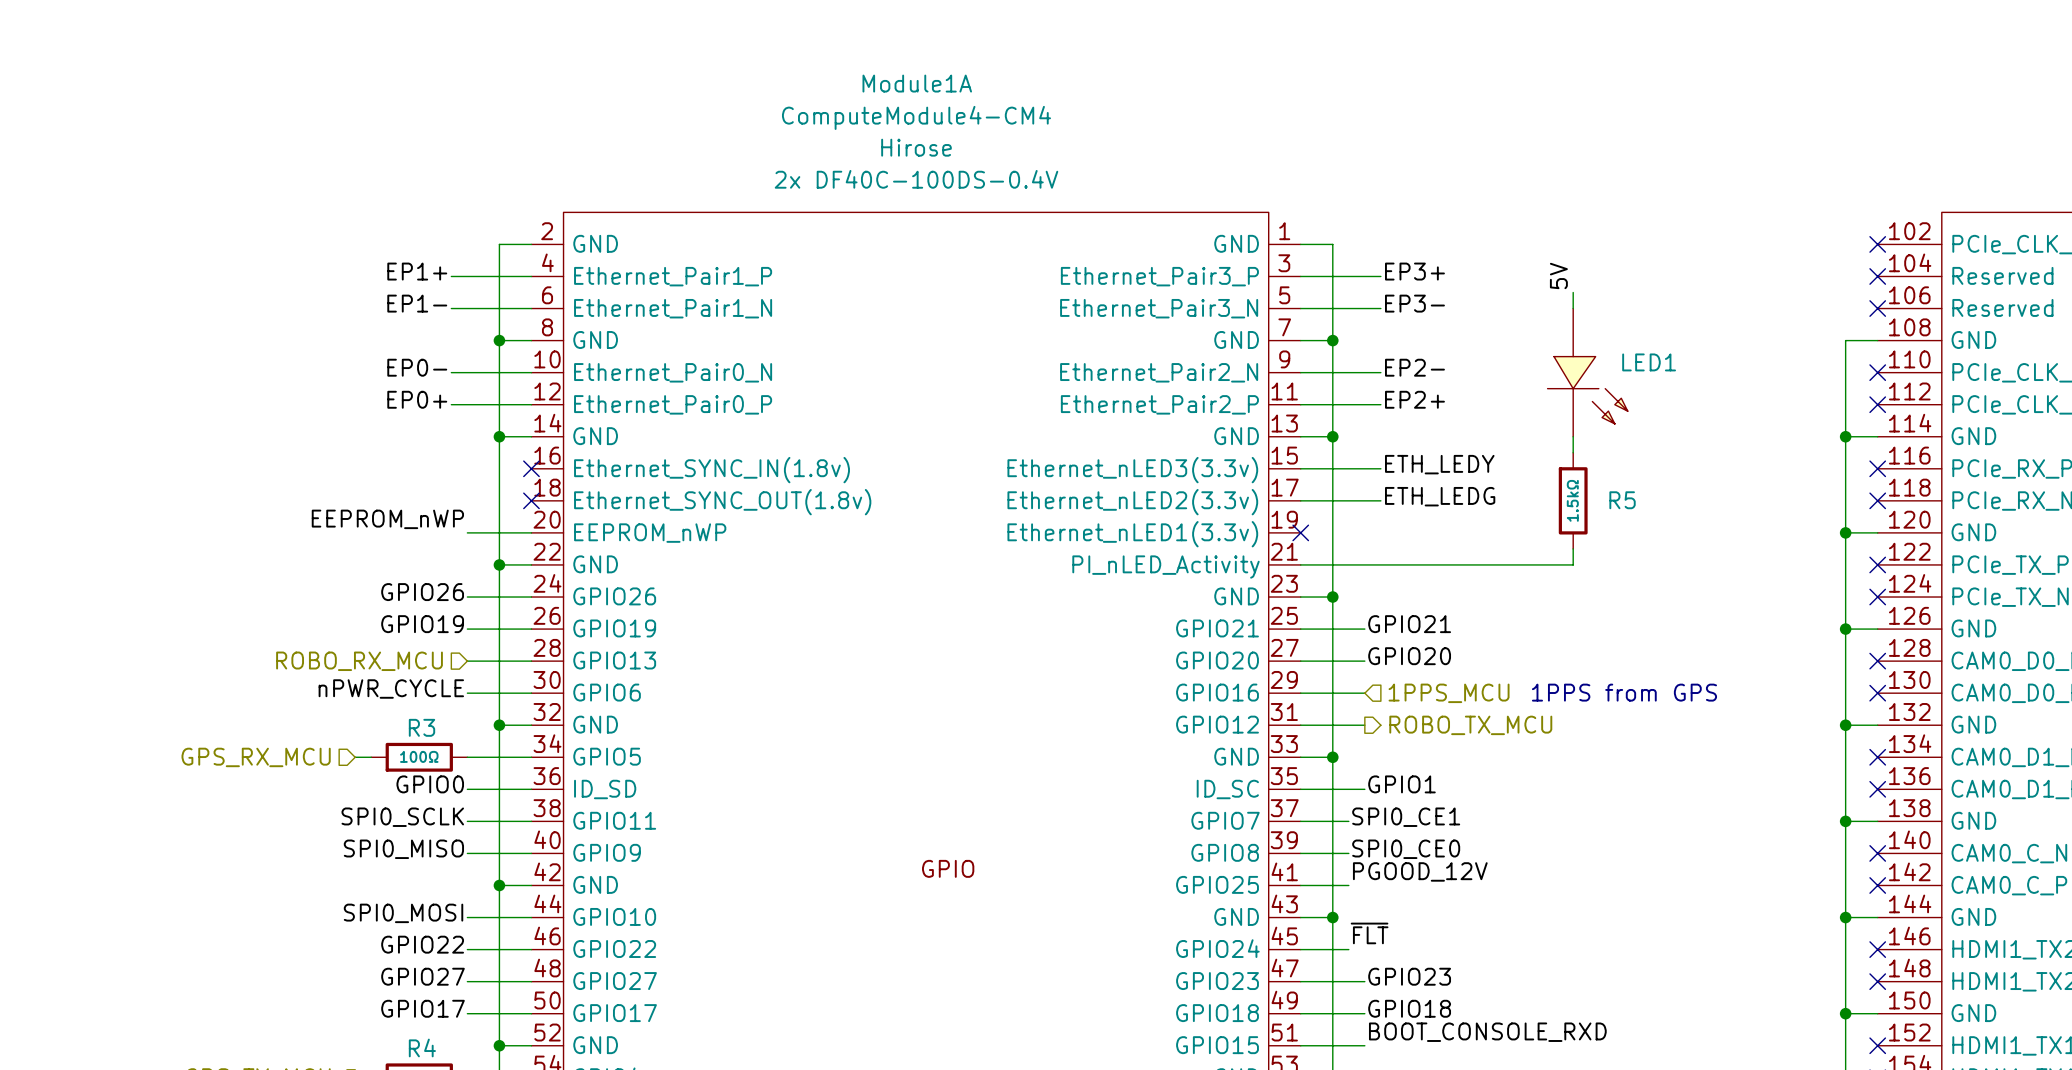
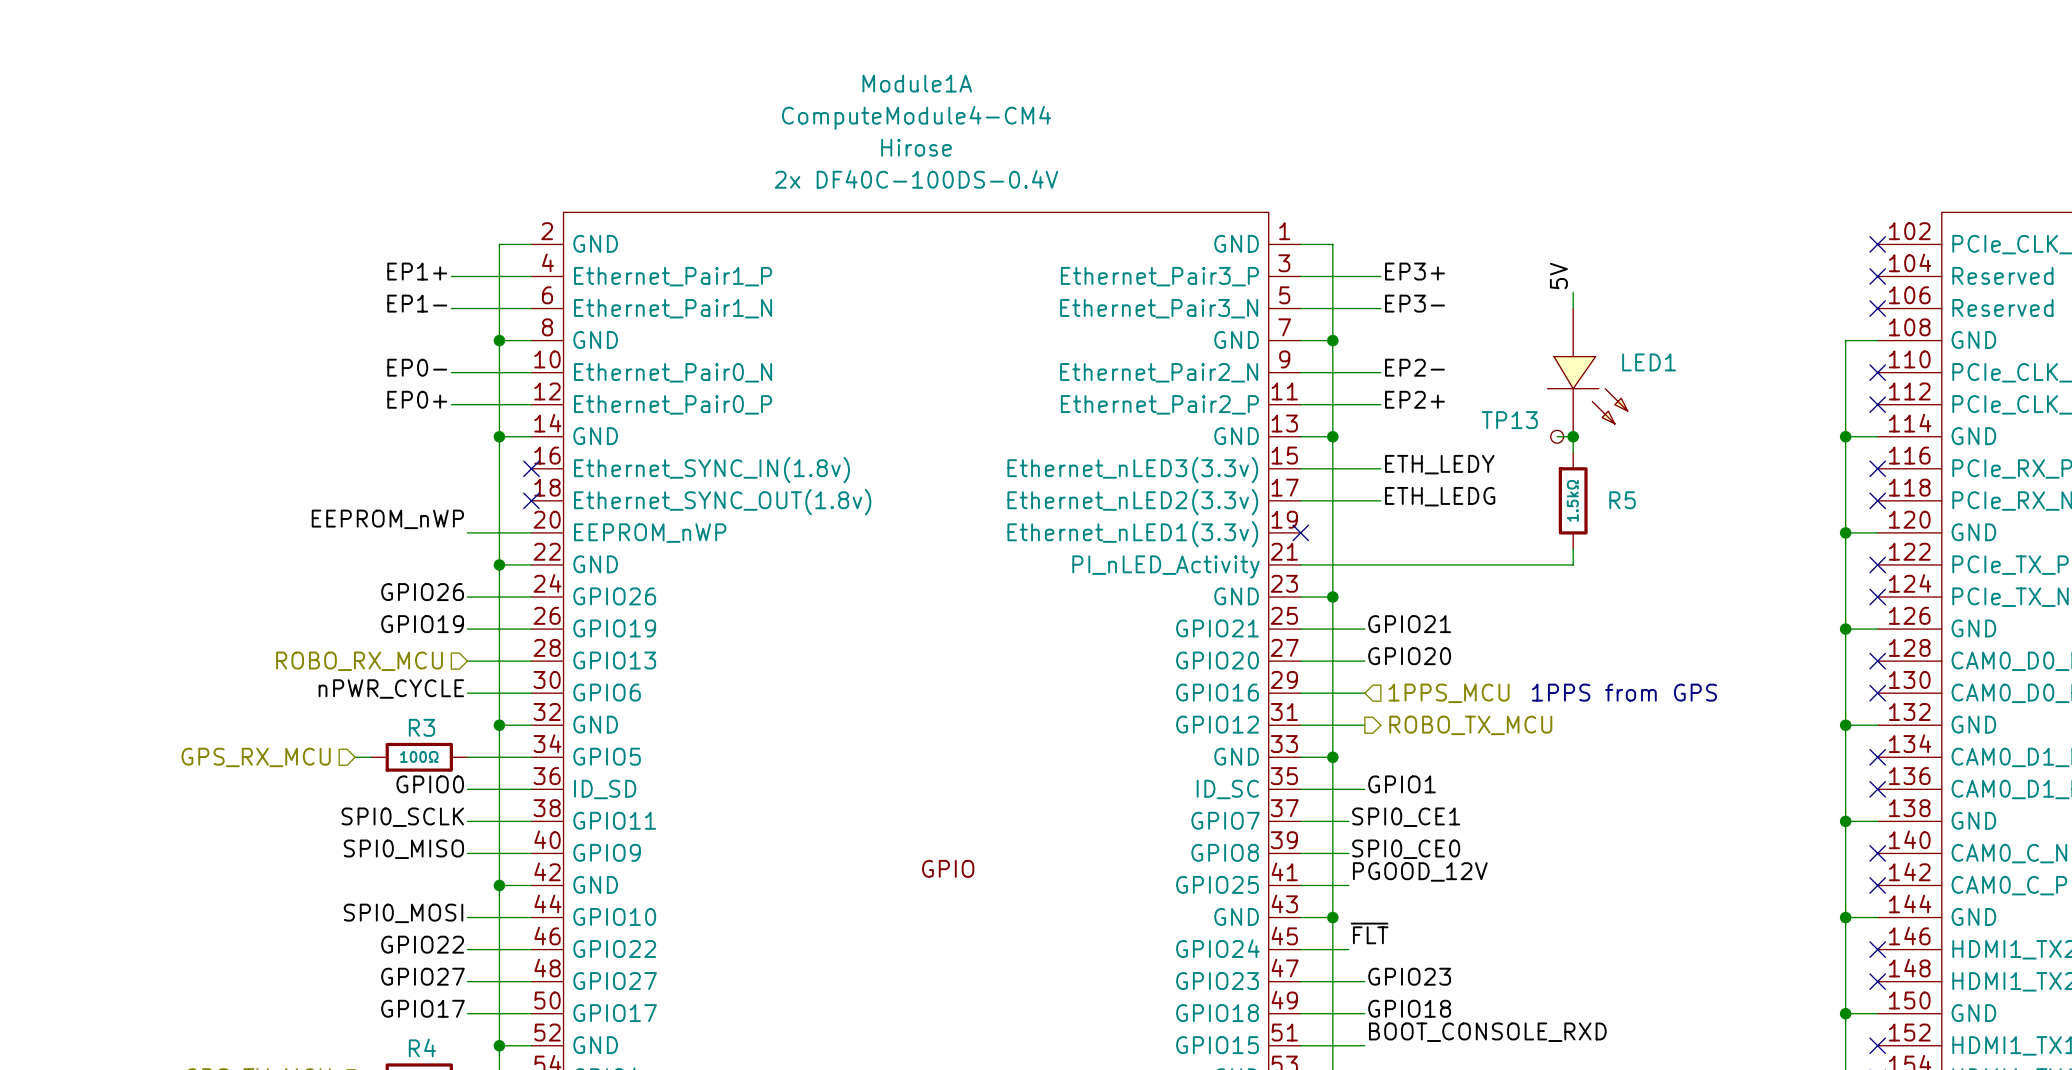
wire: none -> (1557, 436) (1573, 436)
TP13: none -> (1557, 436)
junction: none -> (1573, 436)

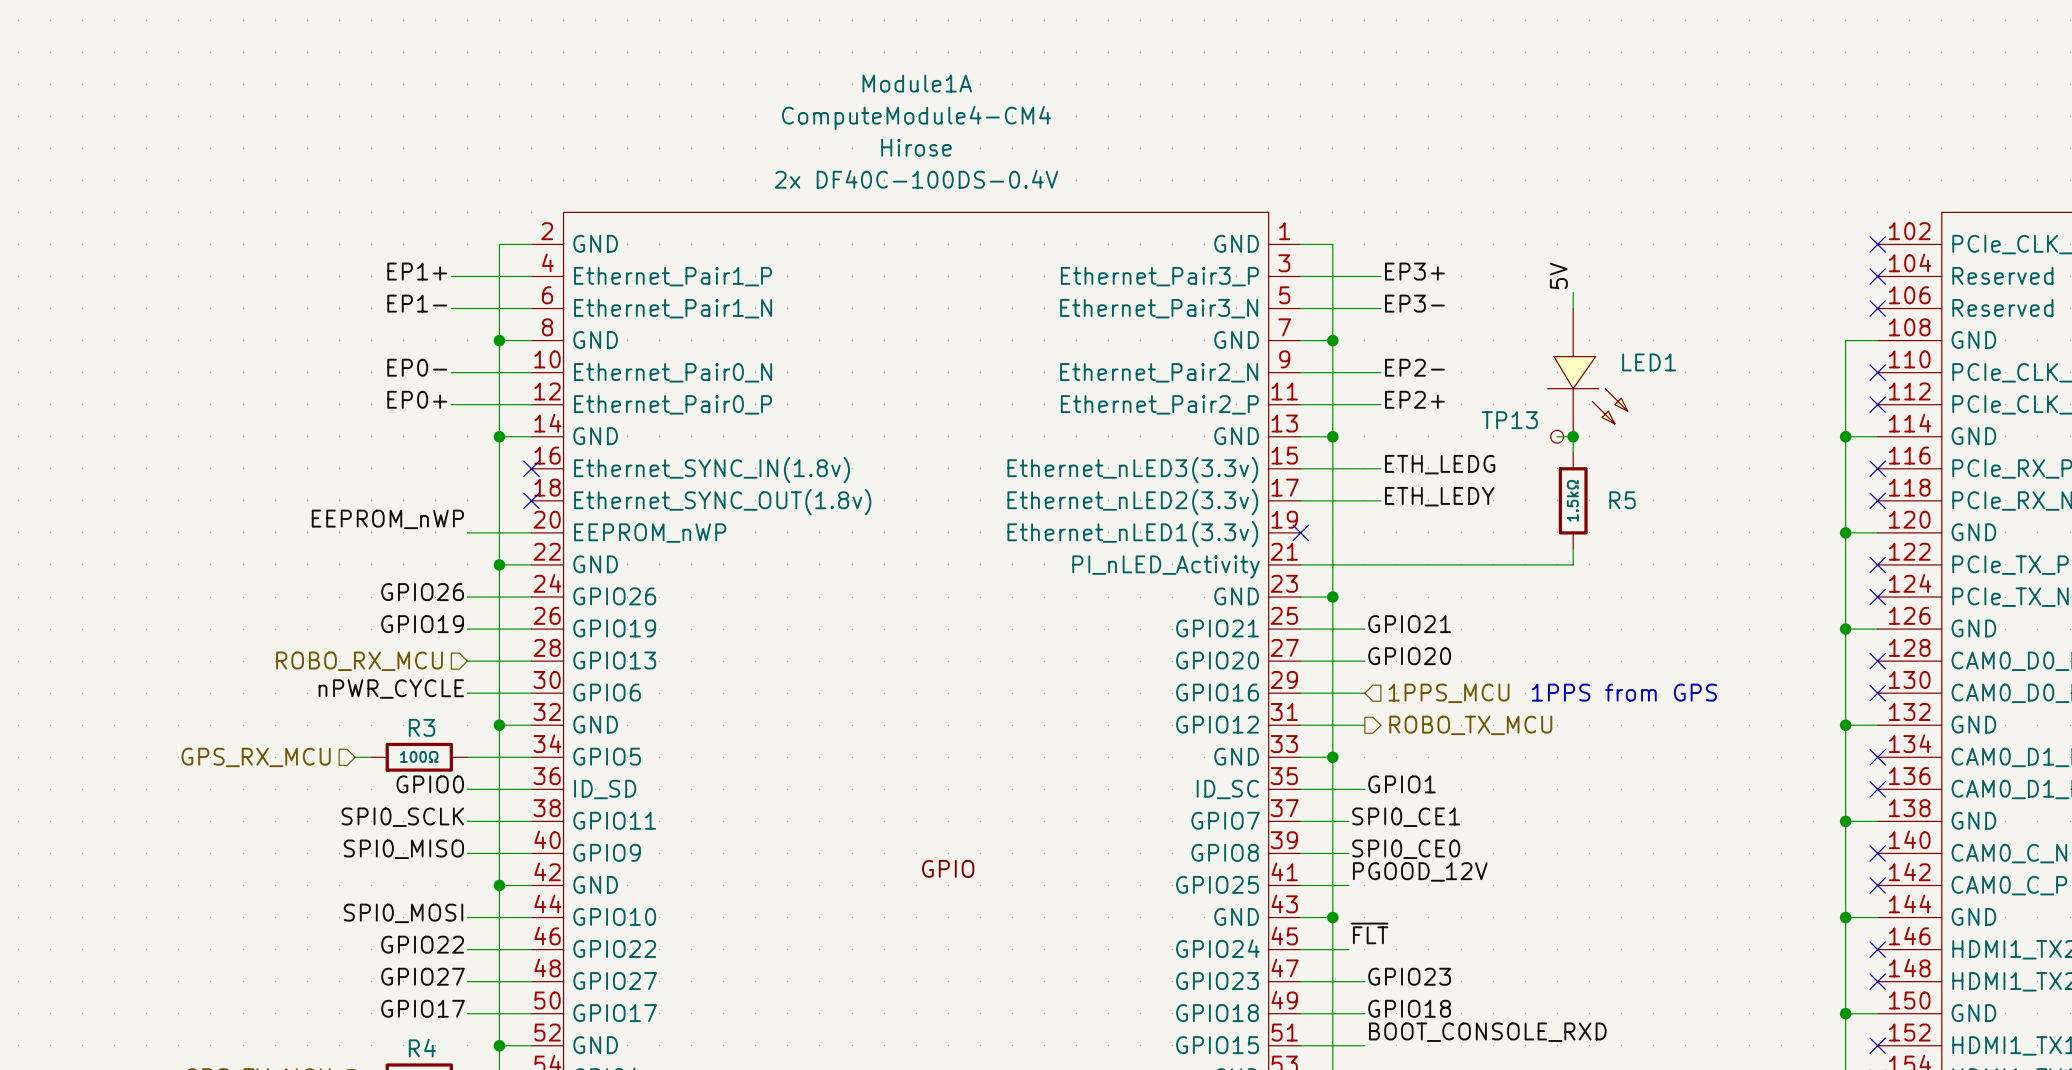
label: ETH_LEDY (1439, 464) -> ETH_LEDG (1440, 464)
label: ETH_LEDG (1440, 496) -> ETH_LEDY (1439, 496)

